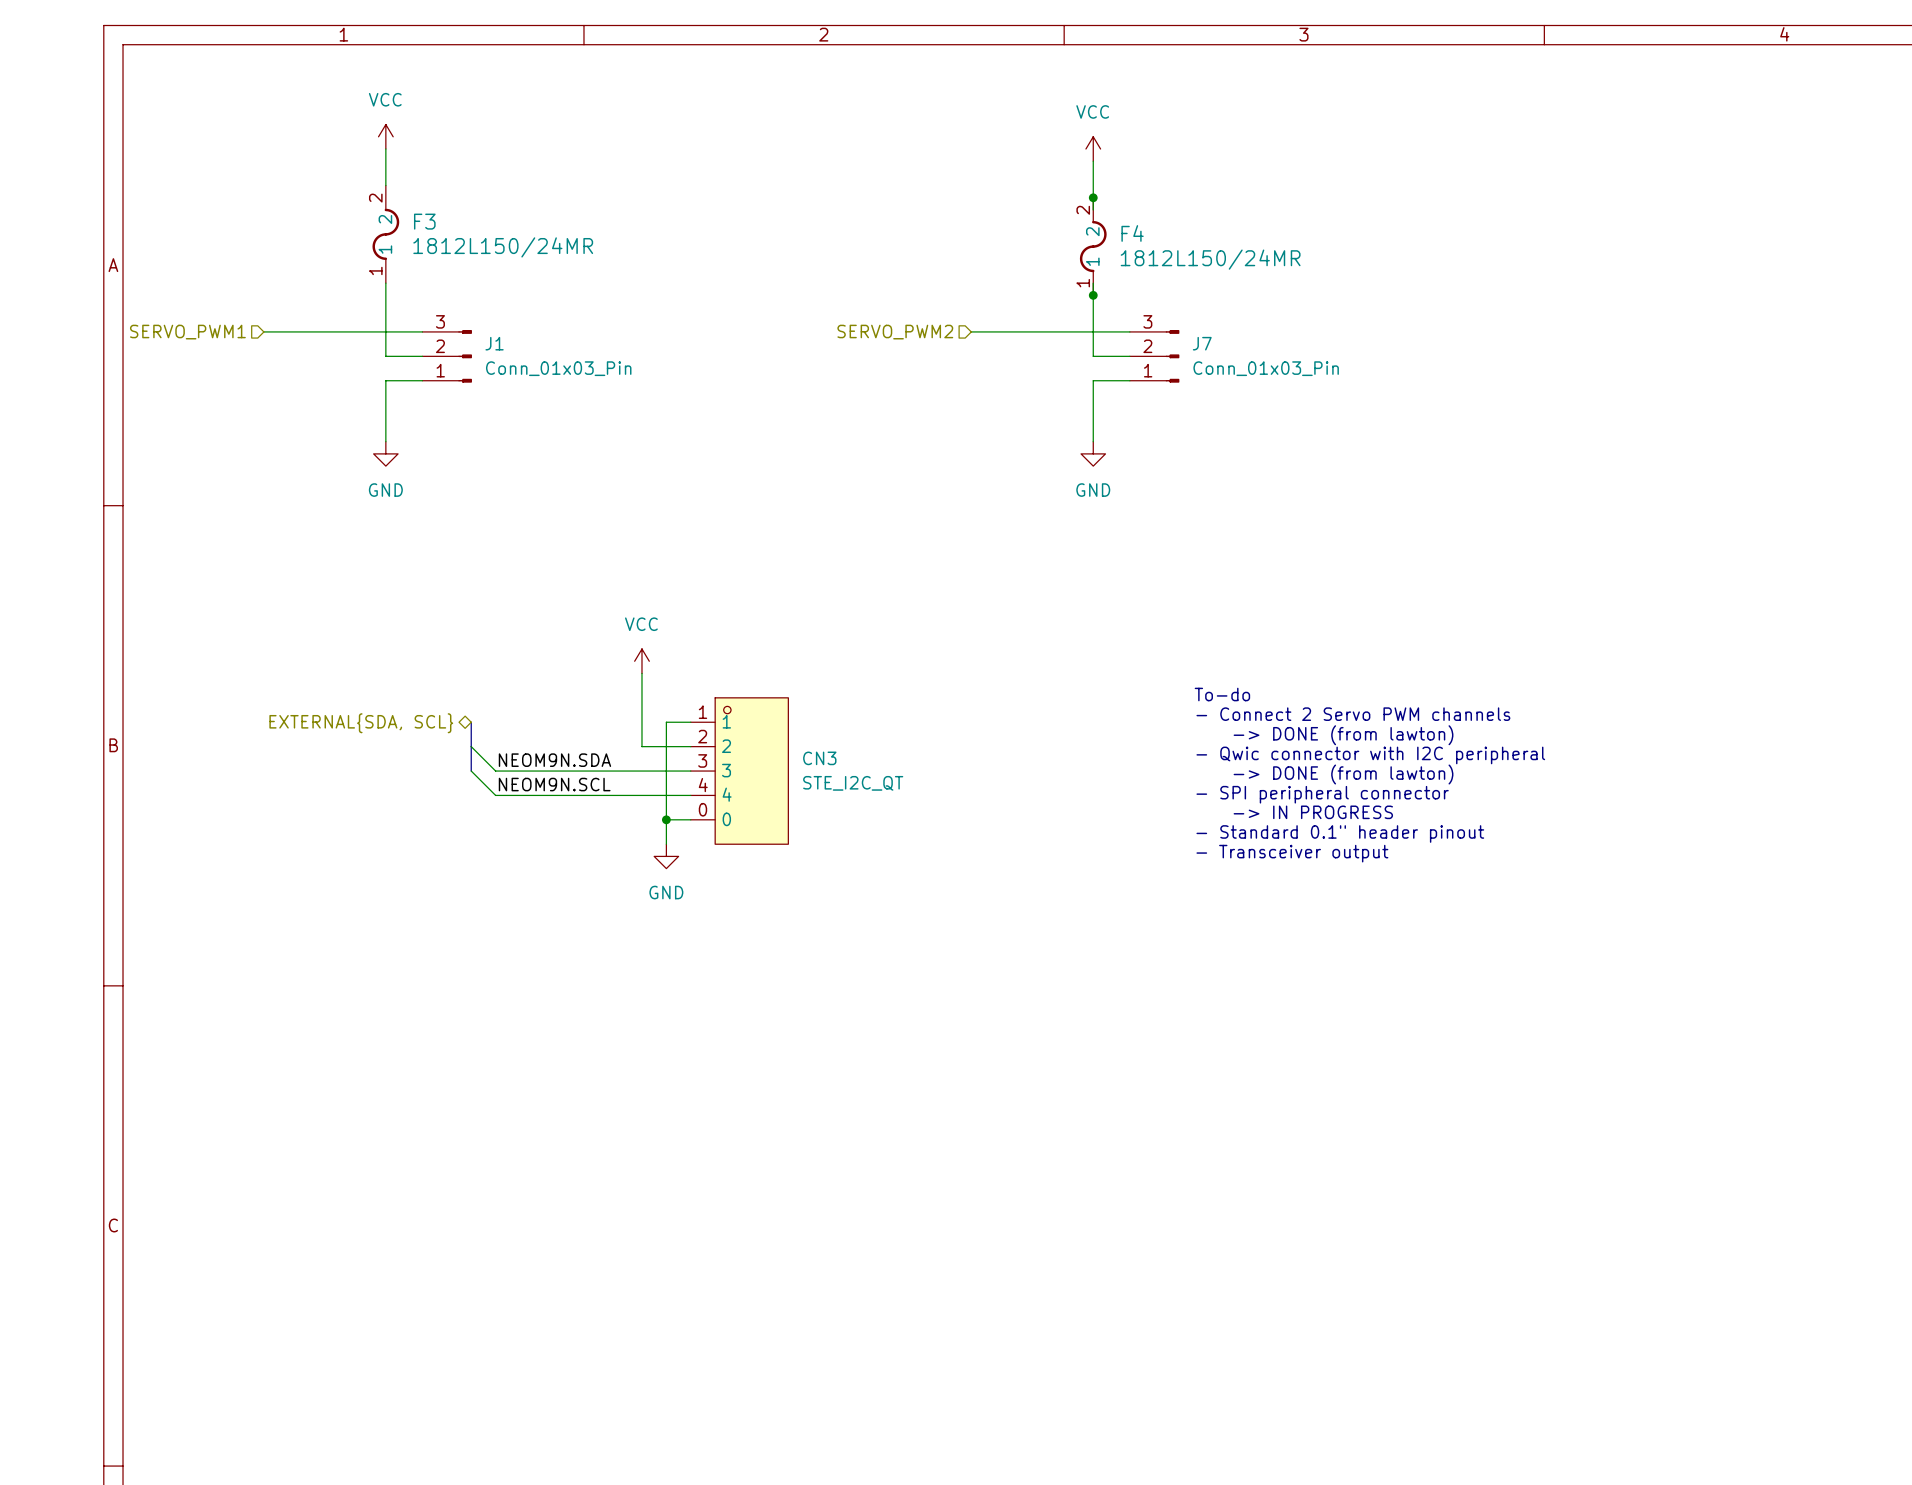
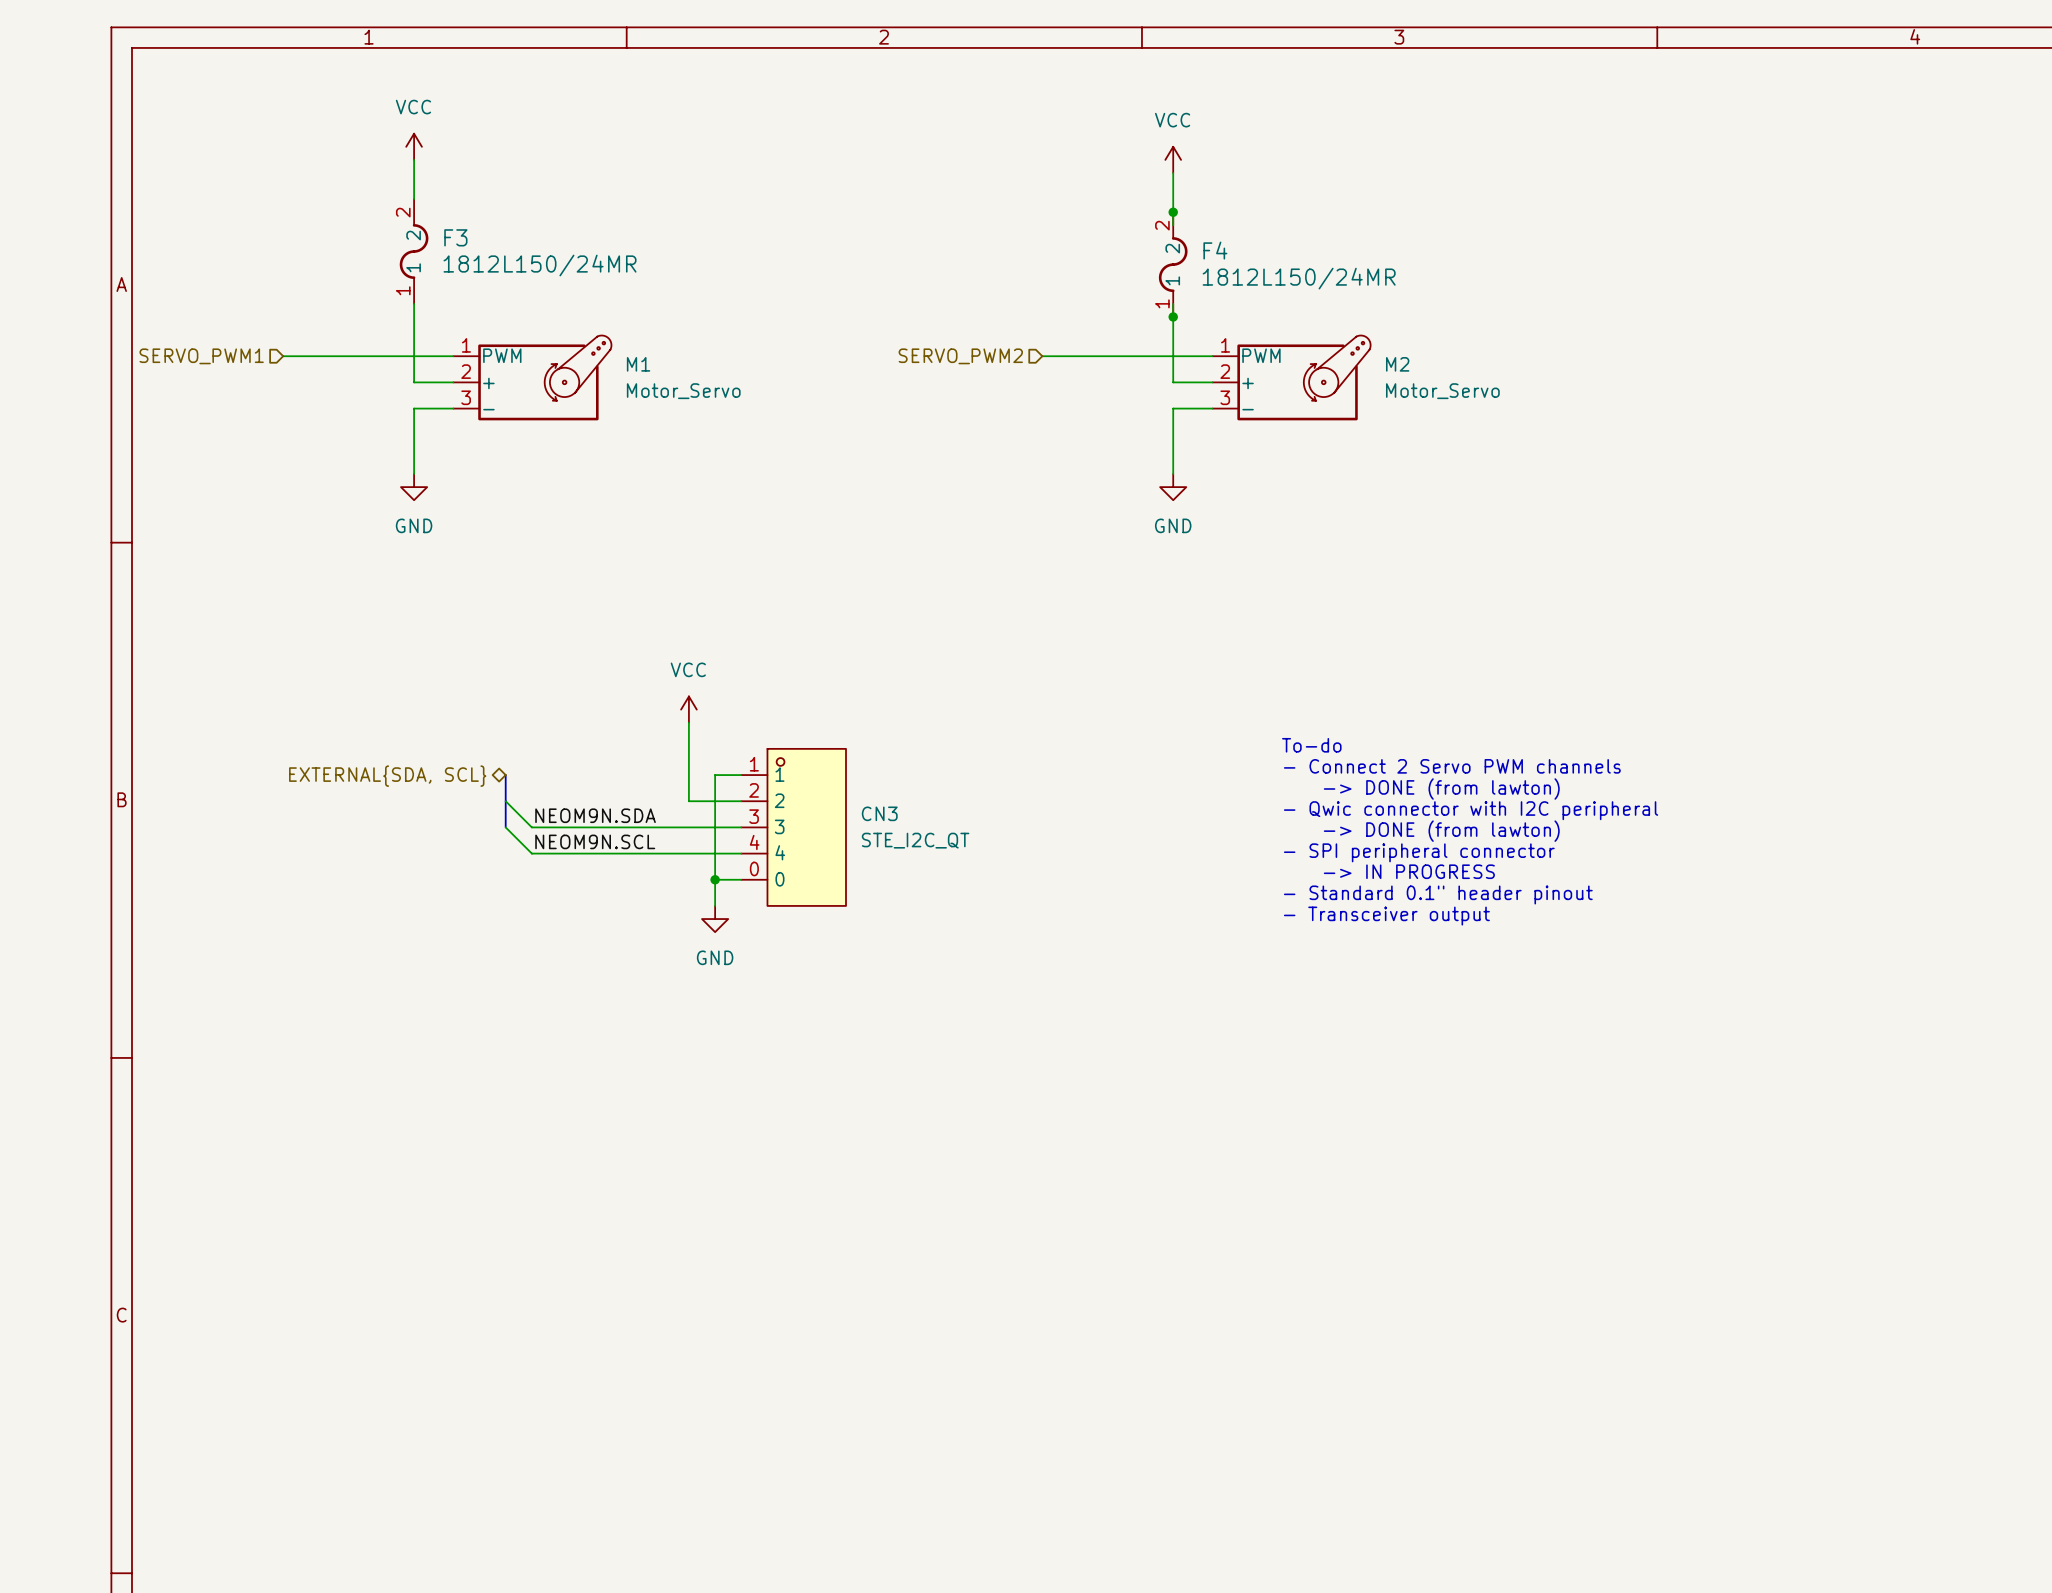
M1: none -> Motor_Servo (532, 377)
M2: none -> Motor_Servo (1291, 377)
J1: Conn_01x03_Pin (447, 356) -> none
J7: Conn_01x03_Pin (1154, 356) -> none

